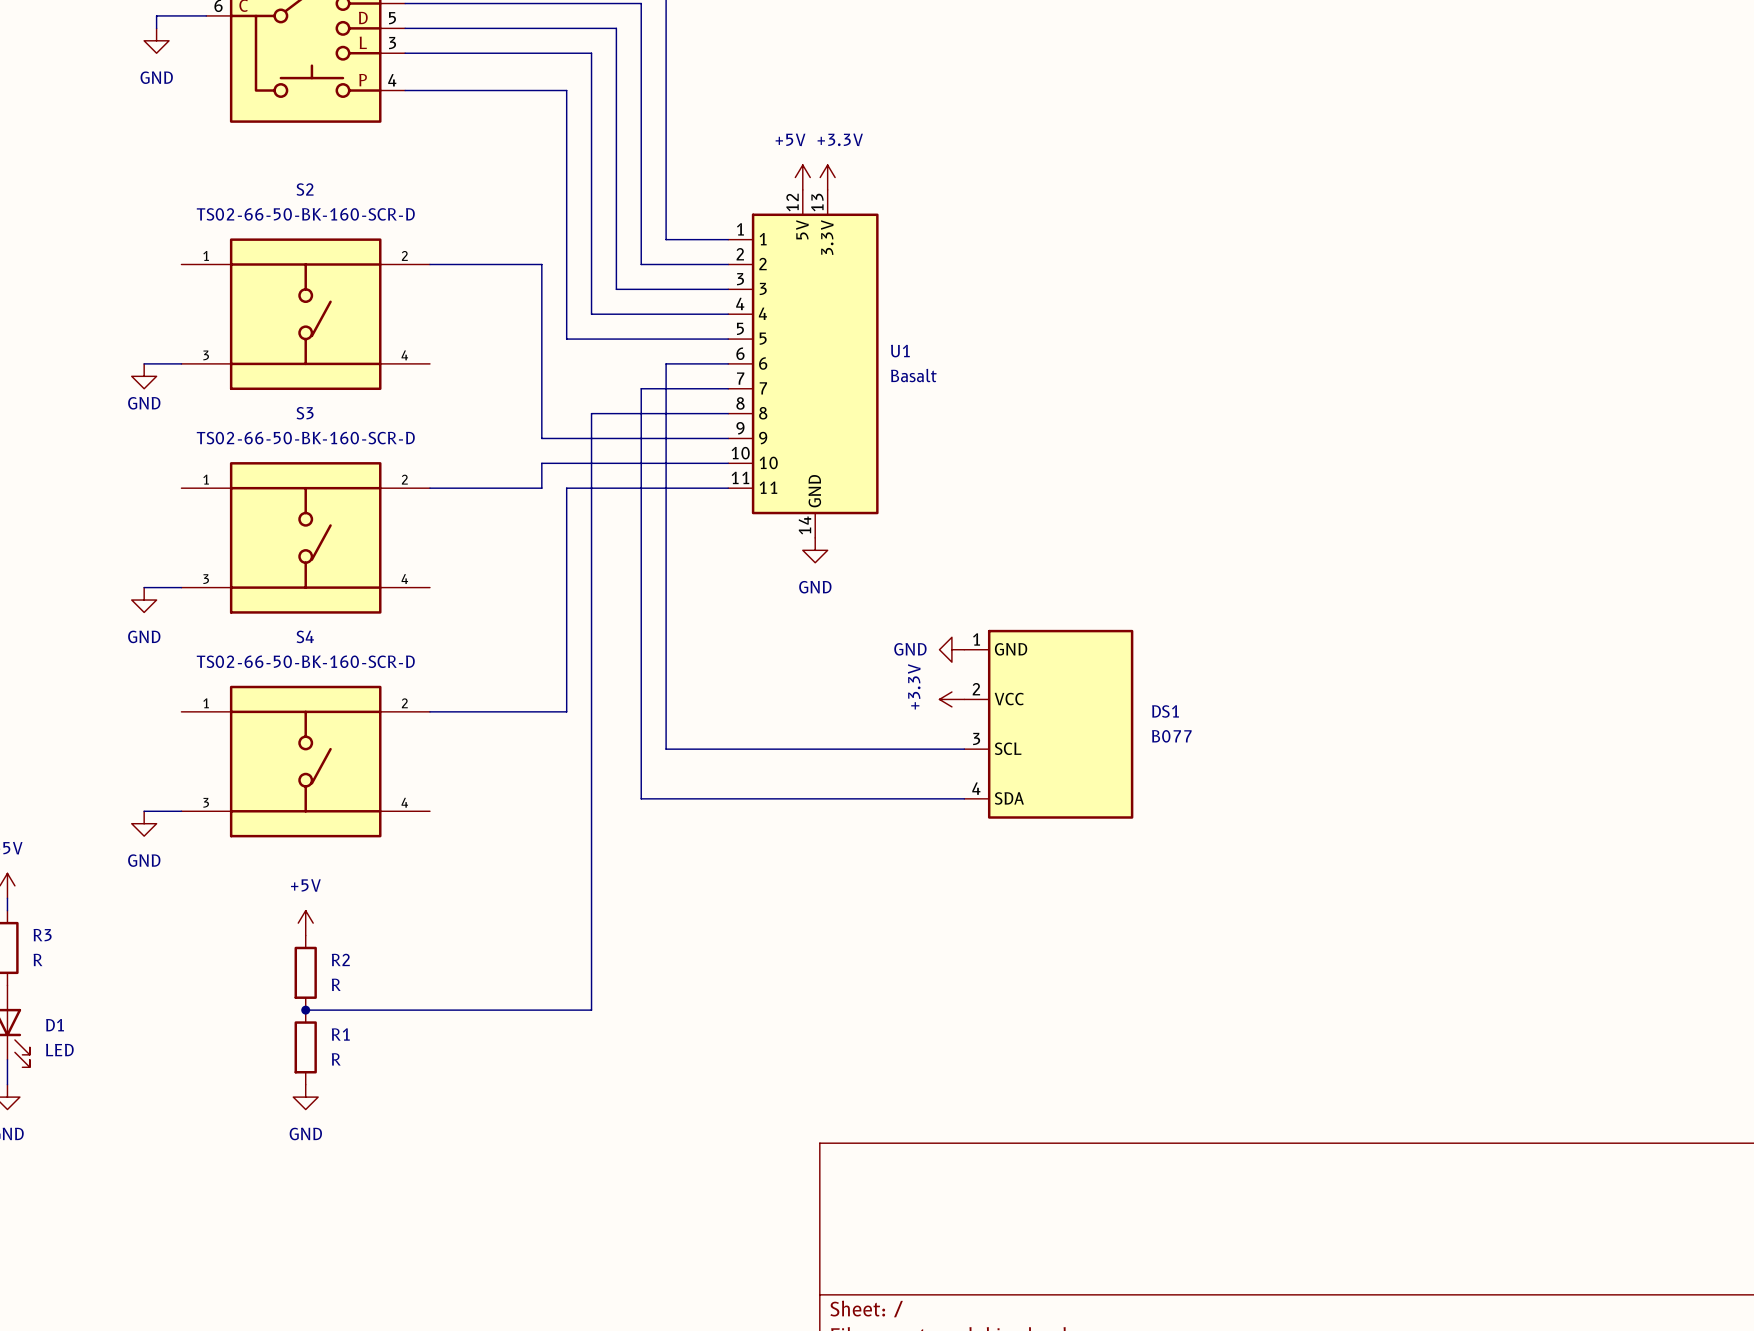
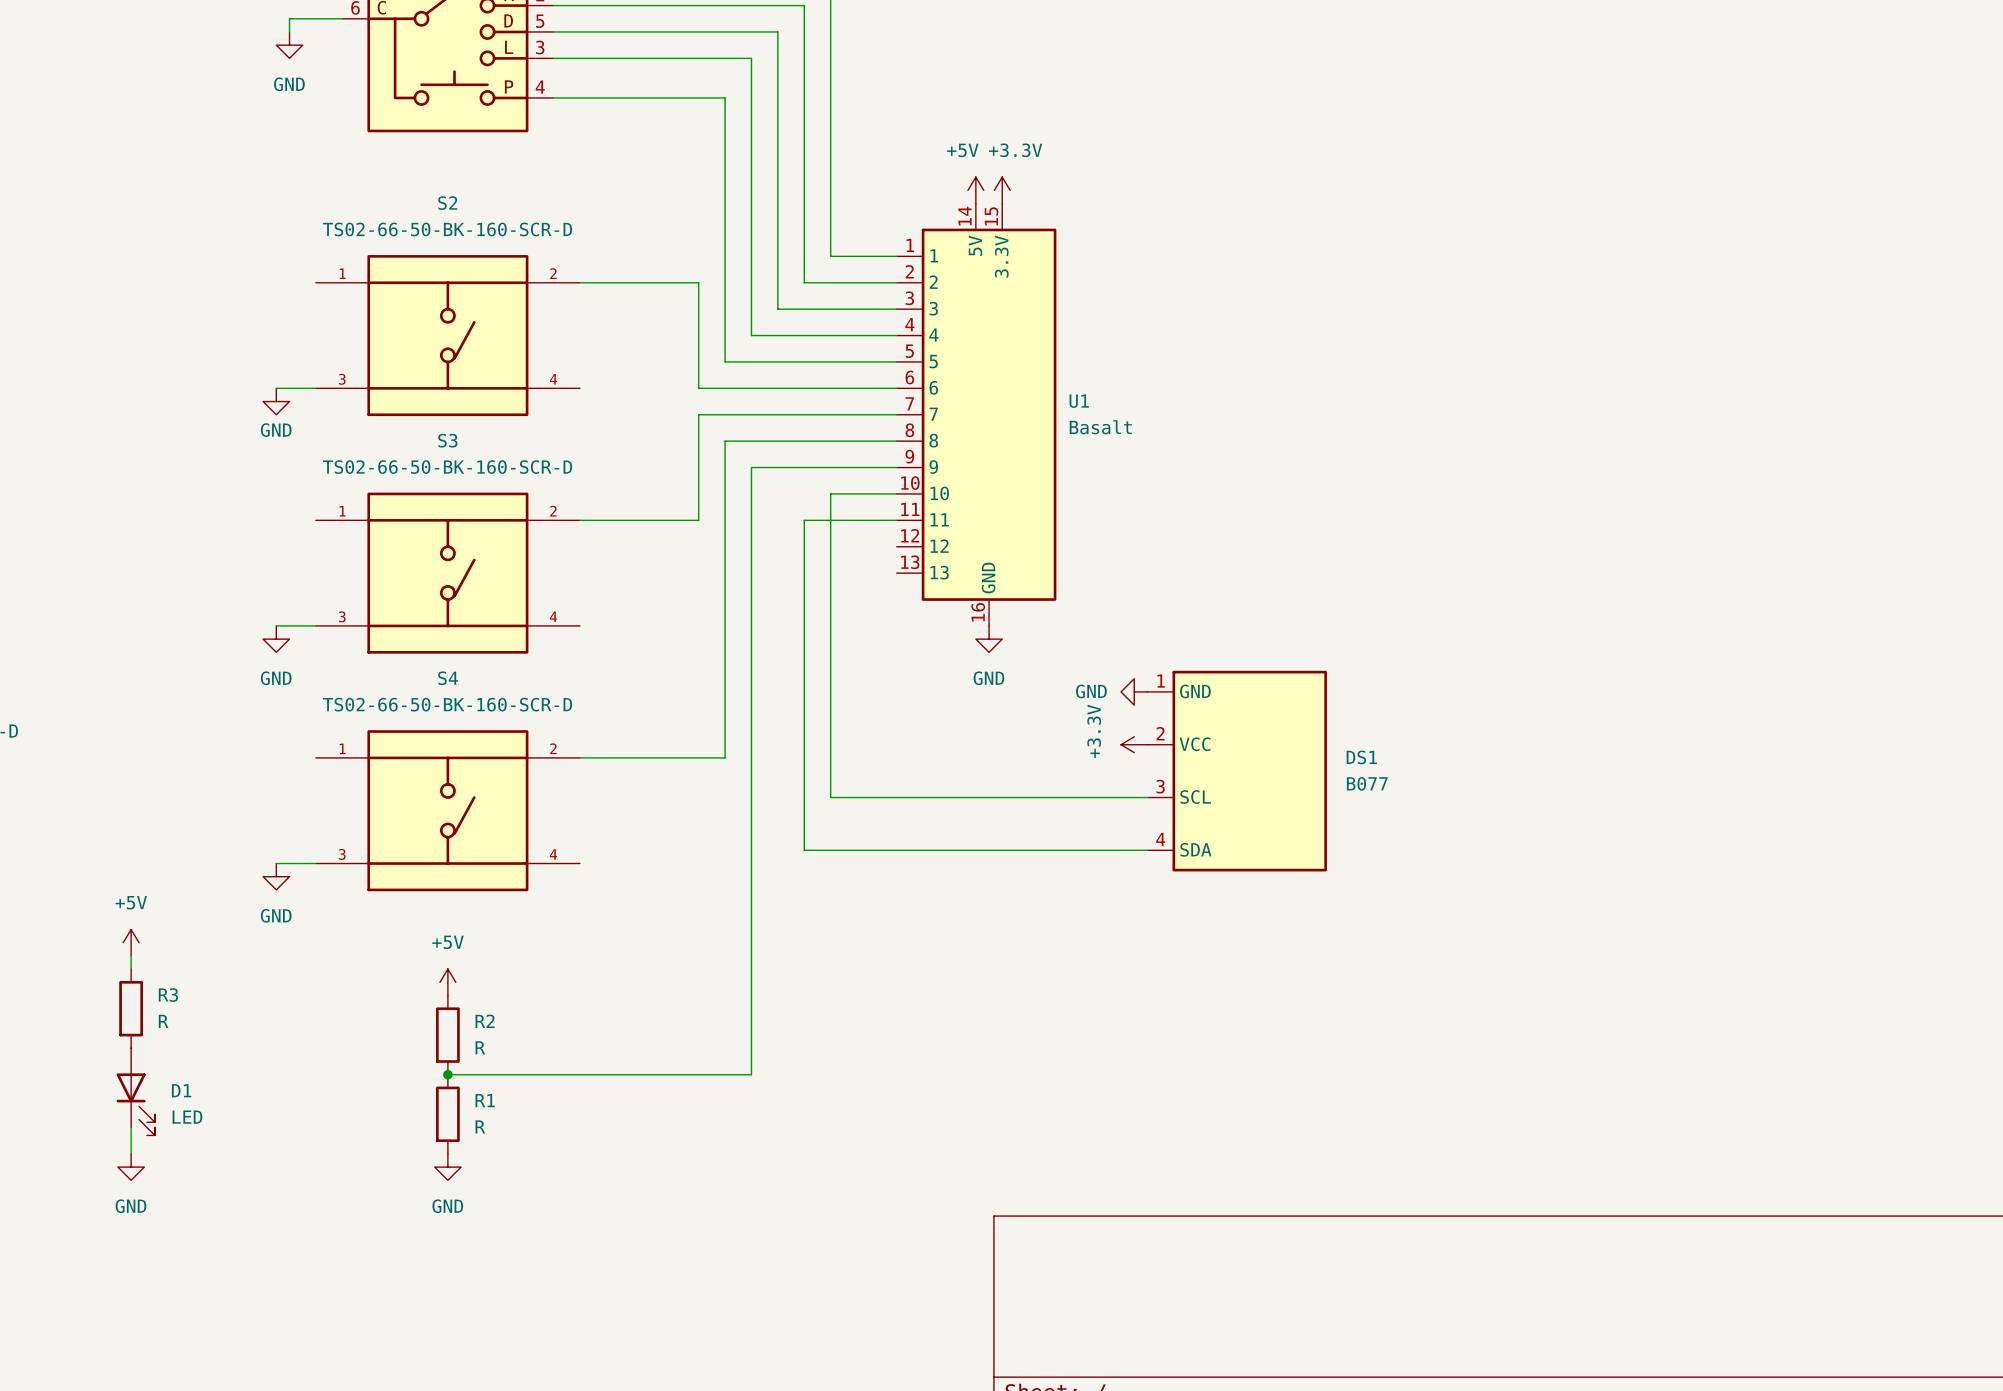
U1 symbol: [728, 189, 879, 538] -> [896, 203, 1057, 626]
wire: (541, 363) (541, 388) -> (698, 467) (698, 493)
wire: (666, 363) (666, 463) (541, 463) -> (830, 388) (698, 388)
wire: (641, 388) (641, 488) (566, 488) -> (804, 414) (698, 414)
wire: (591, 413) (591, 438) (541, 438) -> (751, 441) (725, 441) (725, 520)
power symbol position: GND (815, 550) -> GND (989, 639)

